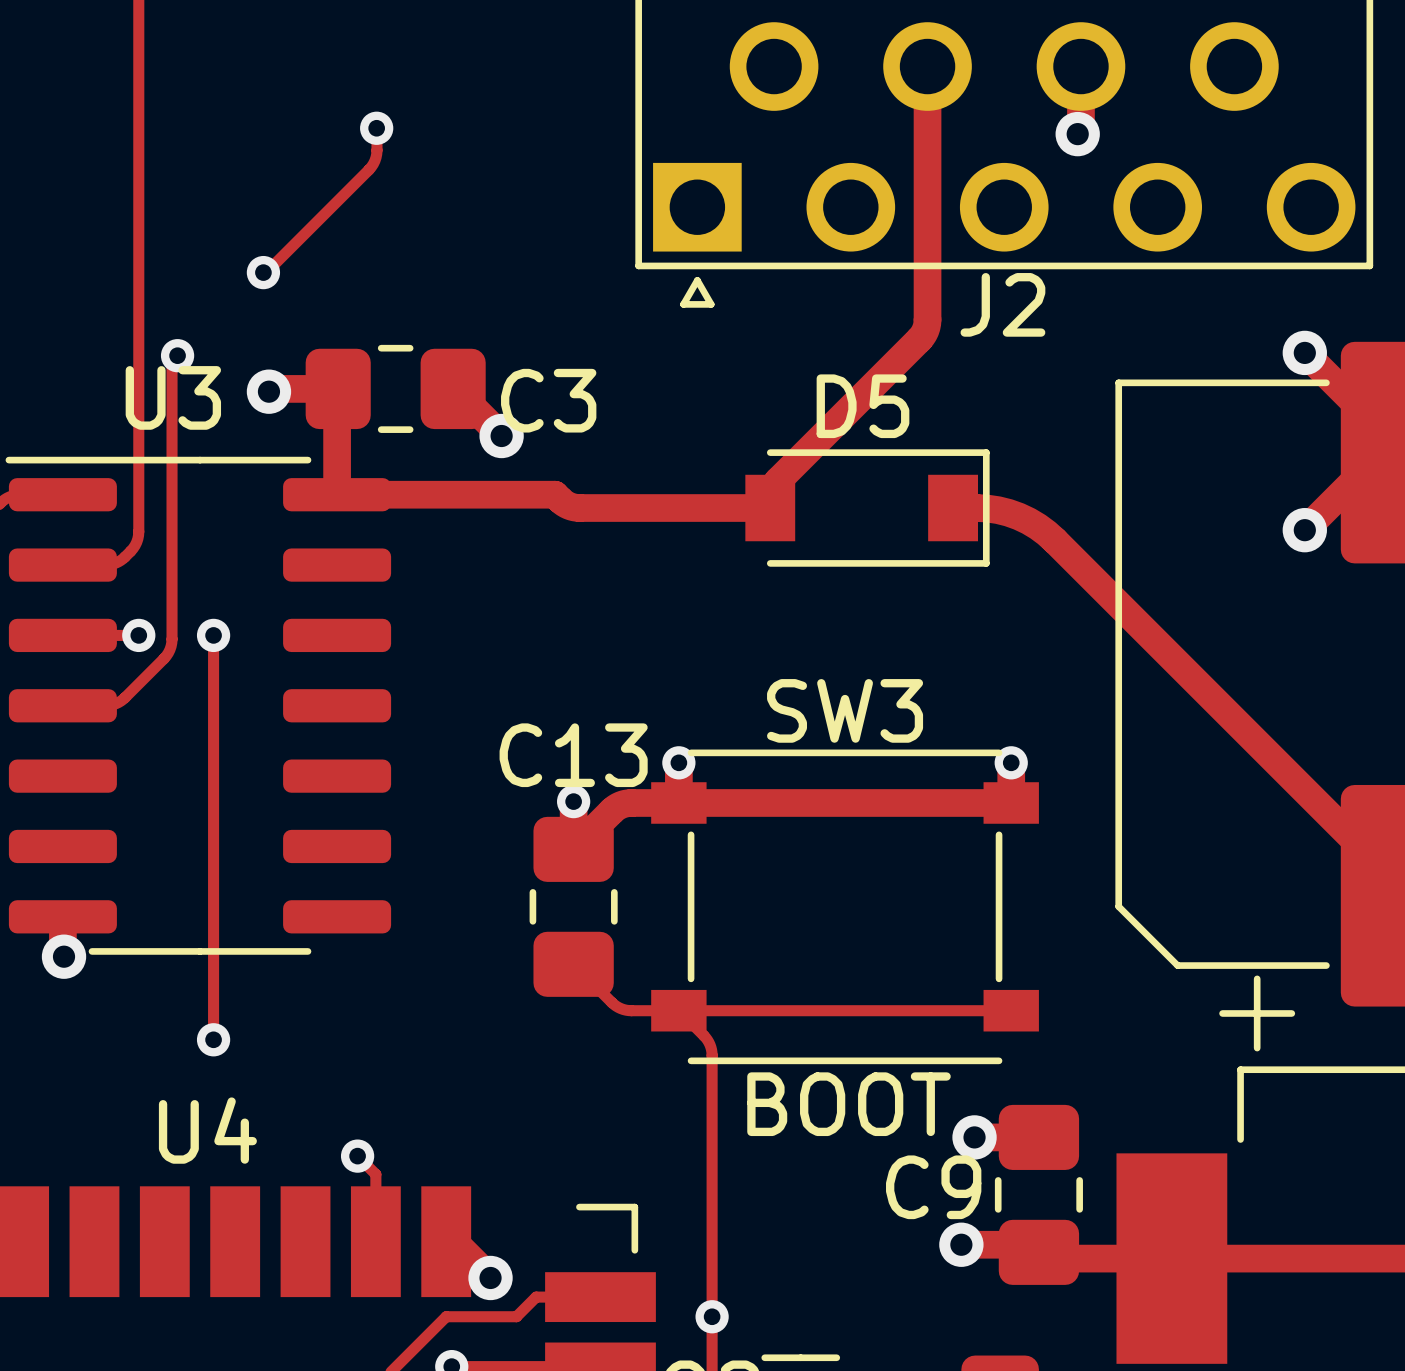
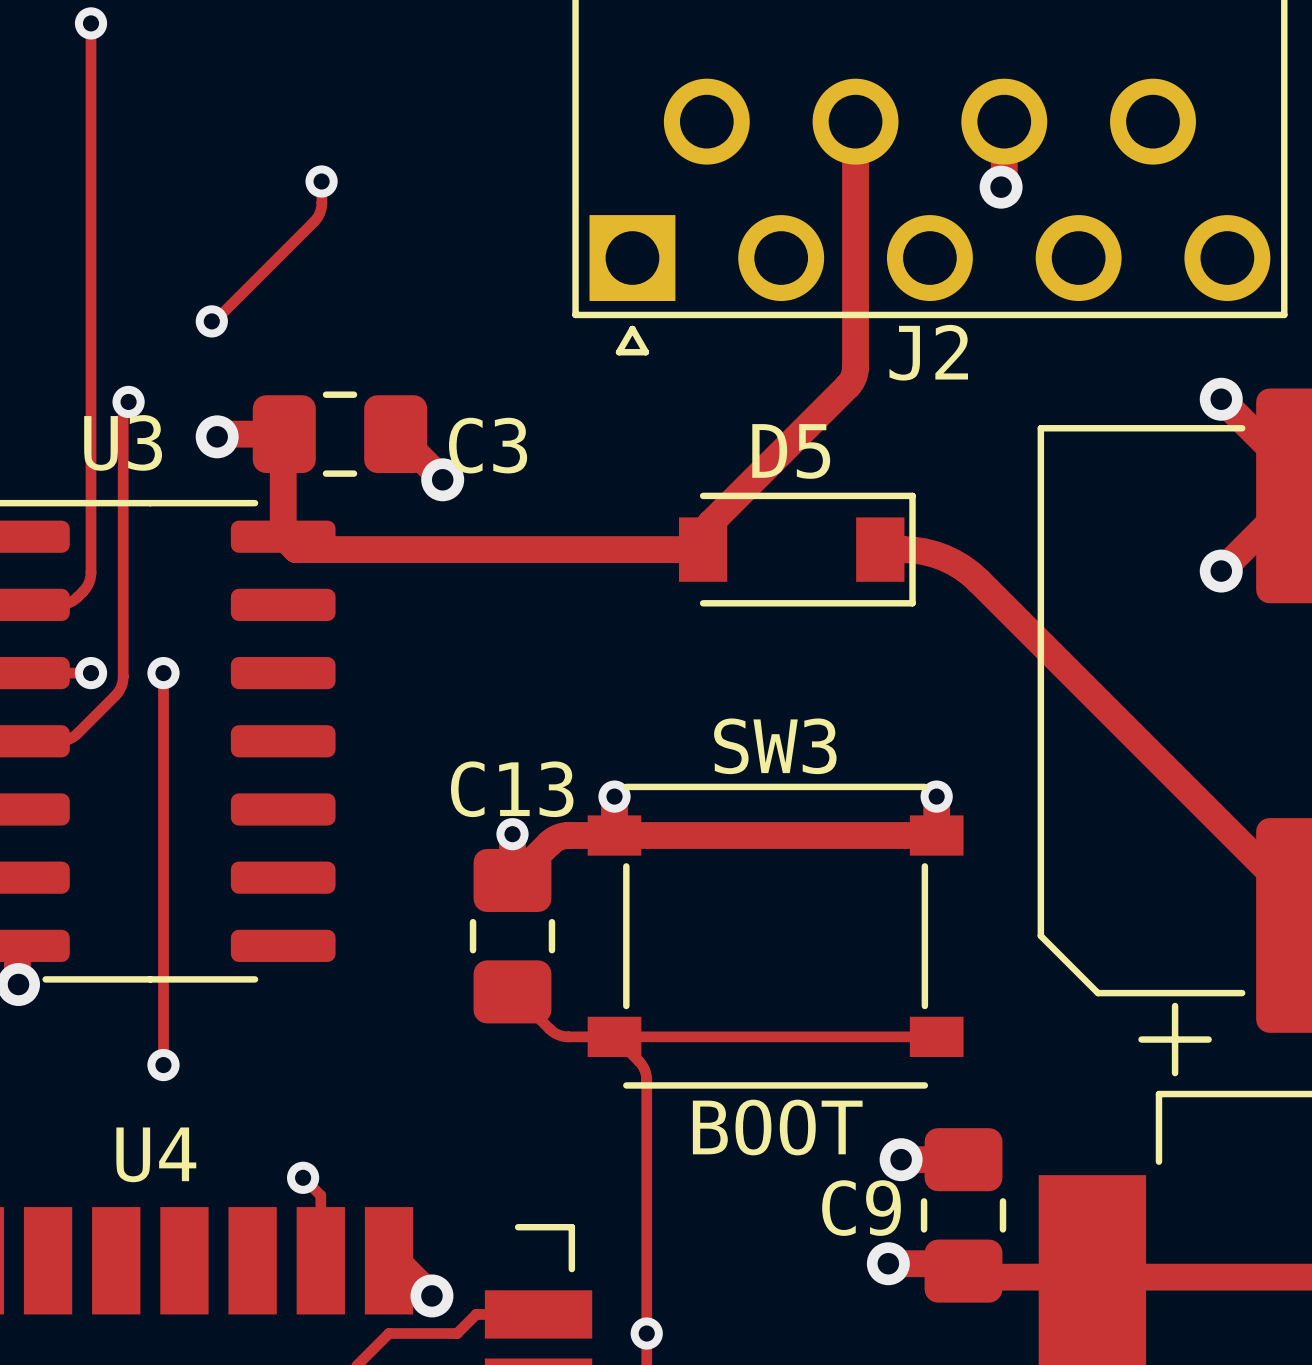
track: (337, 494) (555, 494) (566, 504) (579, 508) -> (283, 536) (296, 549) (518, 549)

